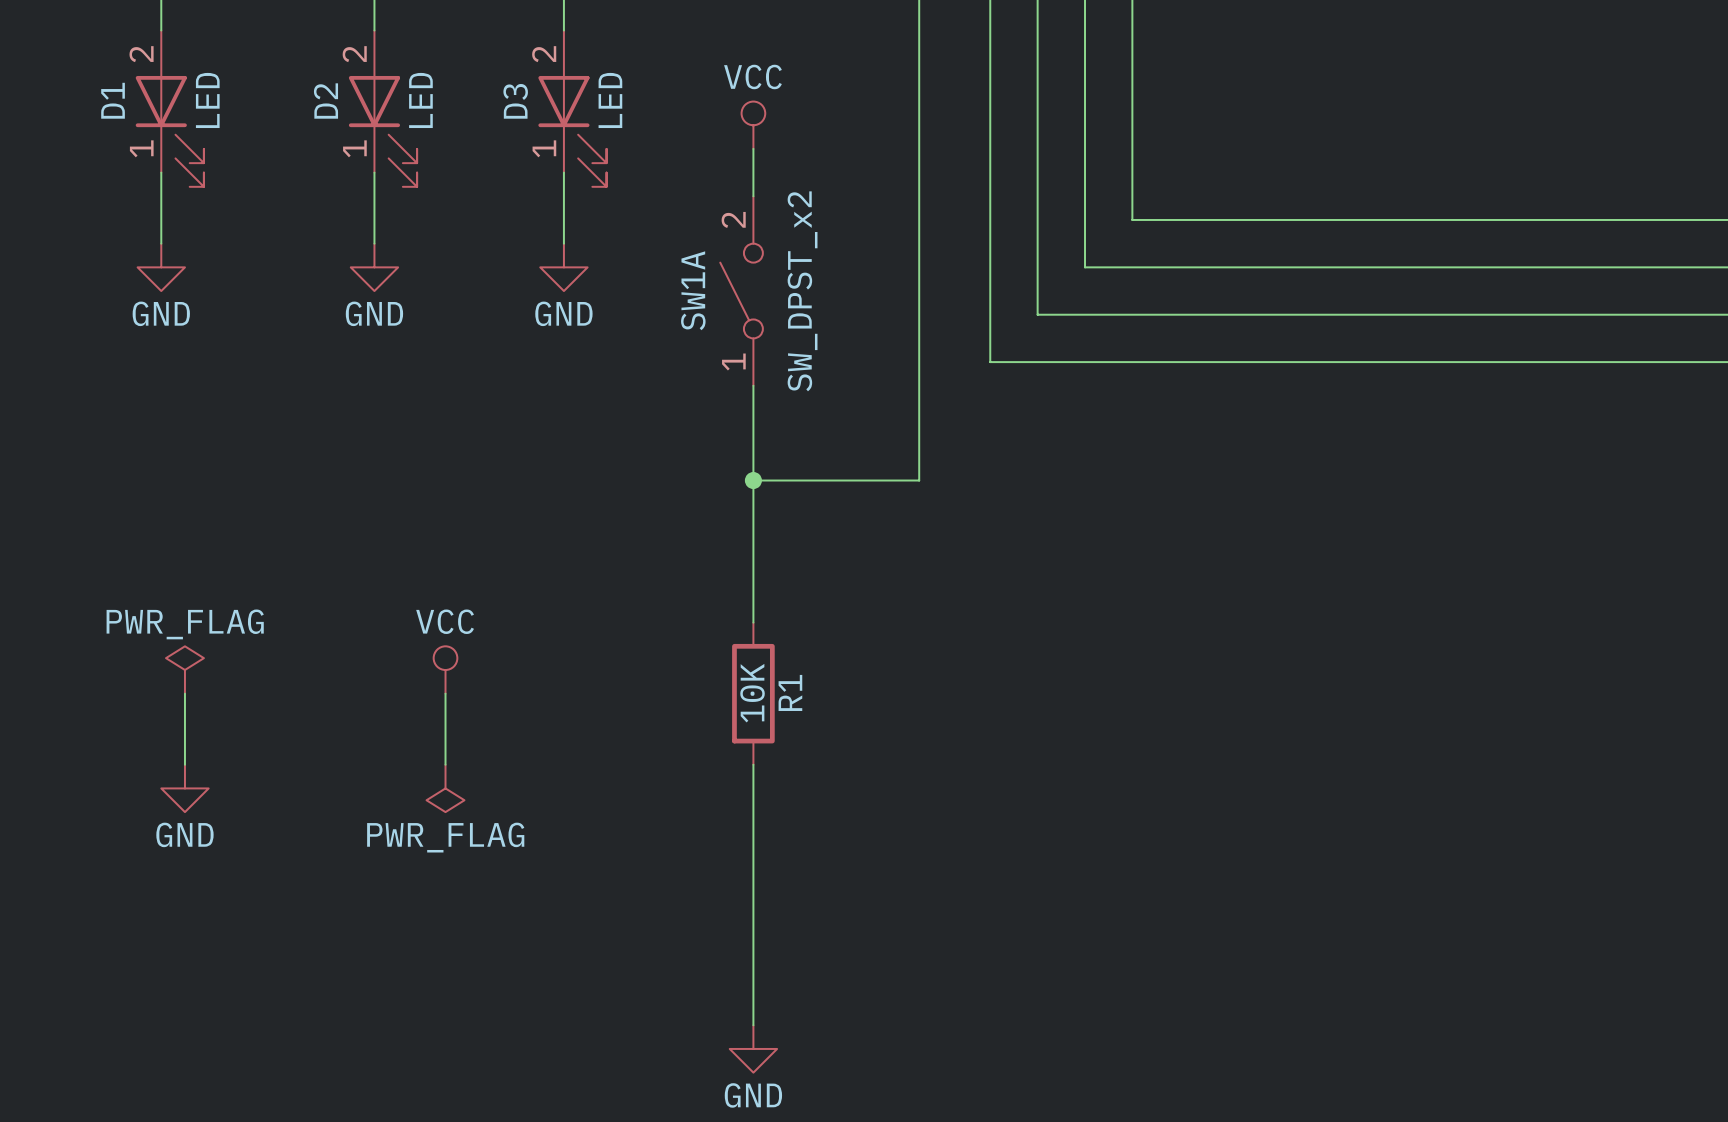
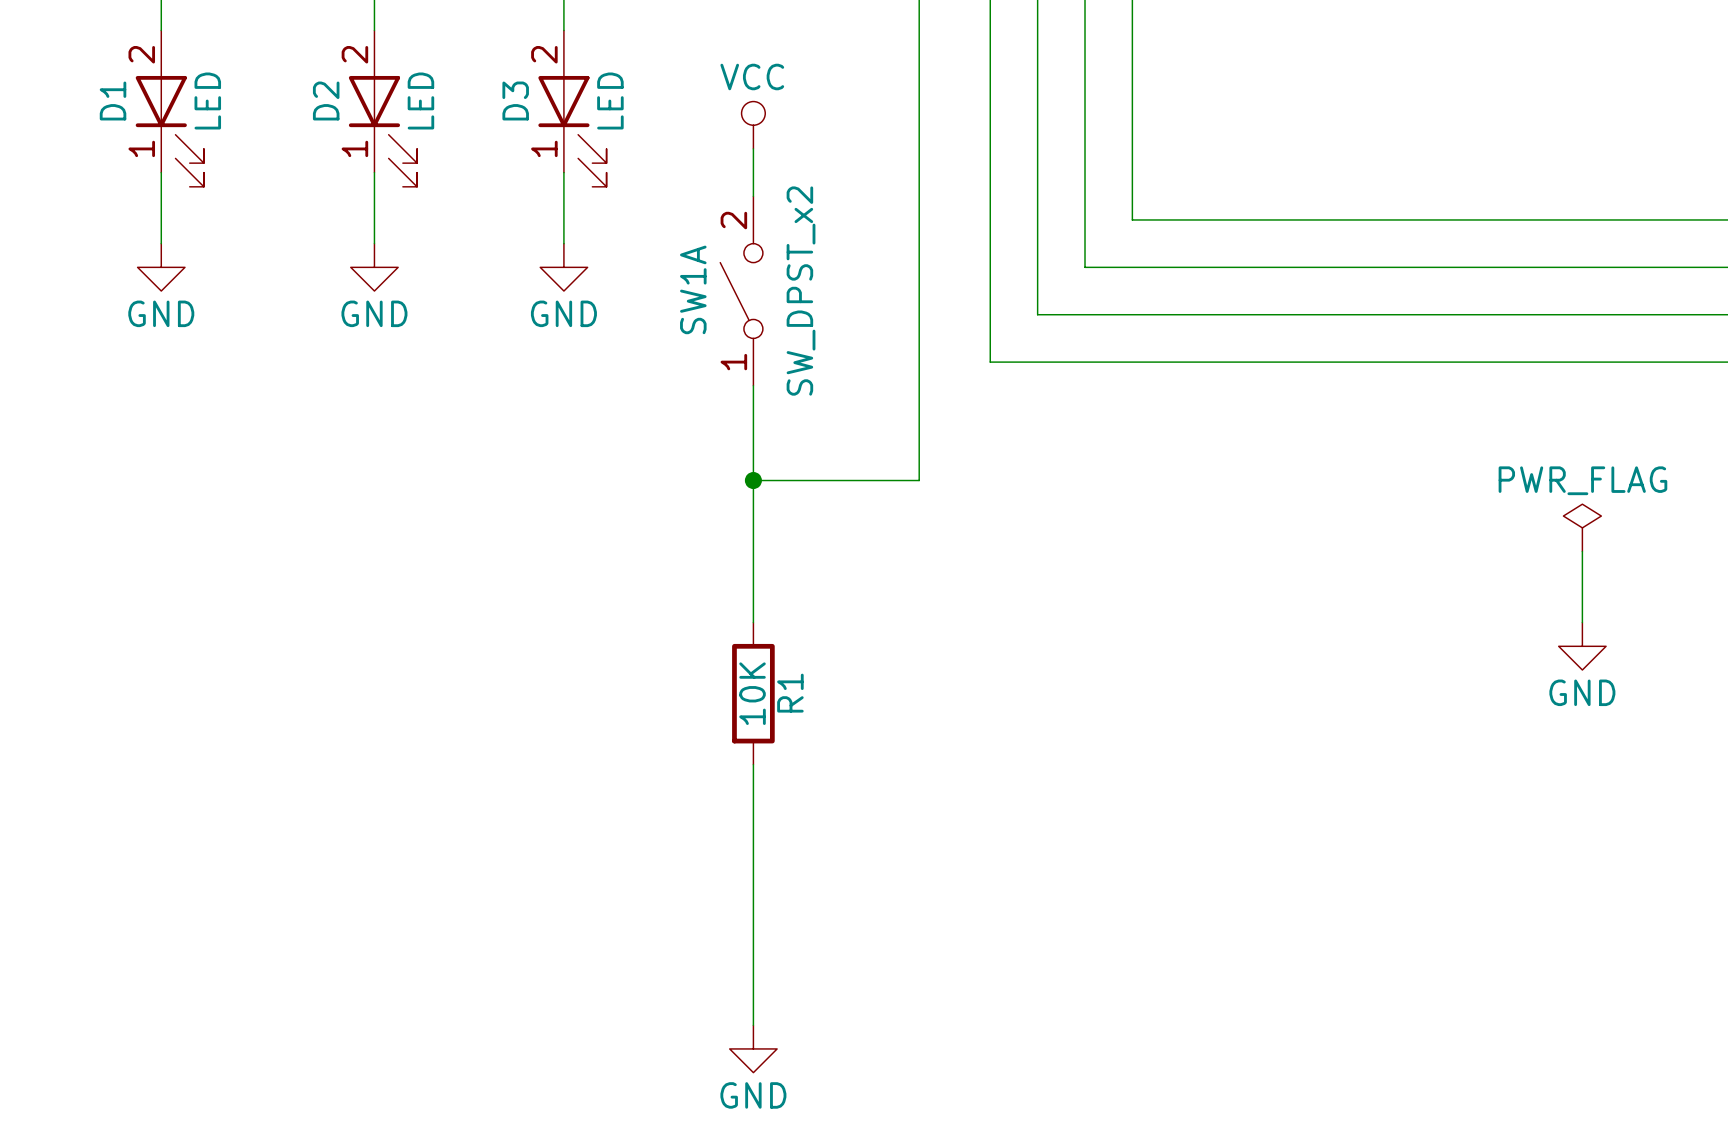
power symbol: none -> PWR_FLAG (1582, 527)
wire: none -> (1582, 551) (1582, 622)
power symbol: none -> GND (1582, 646)
power symbol: PWR_FLAG (184, 670) -> none
power symbol: VCC (445, 670) -> none
wire: (184, 693) (184, 764) -> none
wire: (445, 693) (445, 764) -> none
power symbol: GND (184, 788) -> none
power symbol: PWR_FLAG (445, 788) -> none

